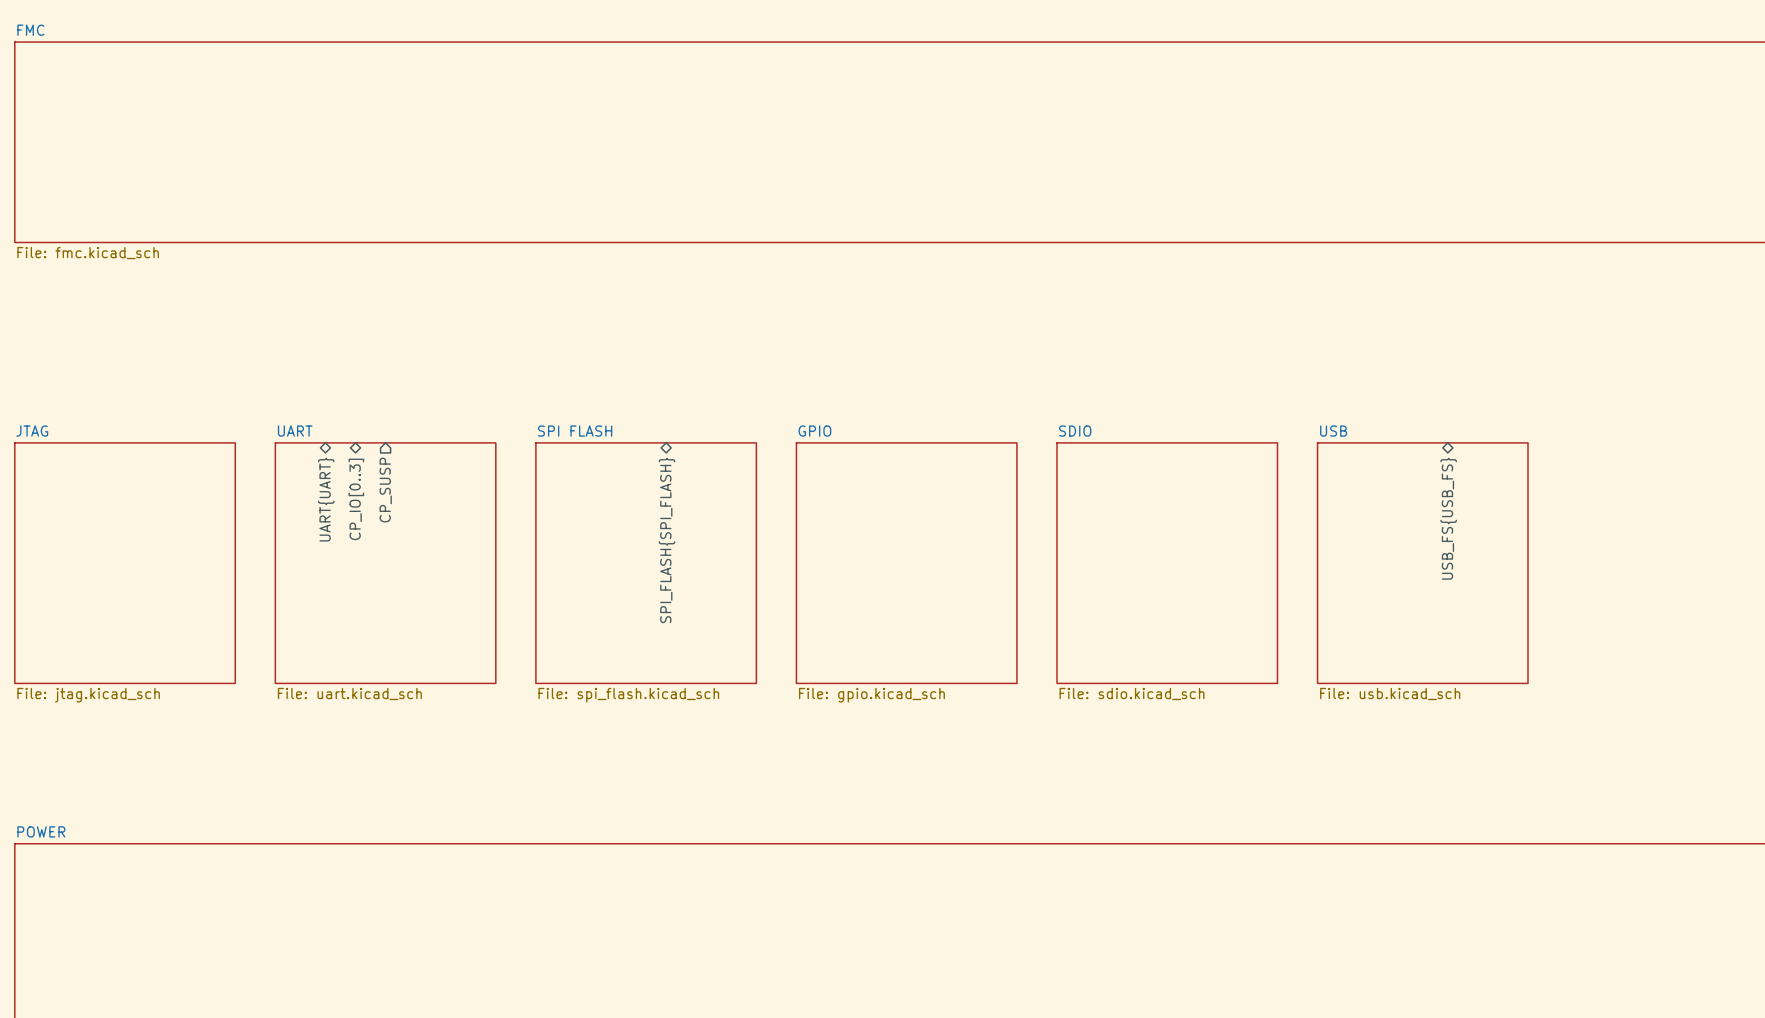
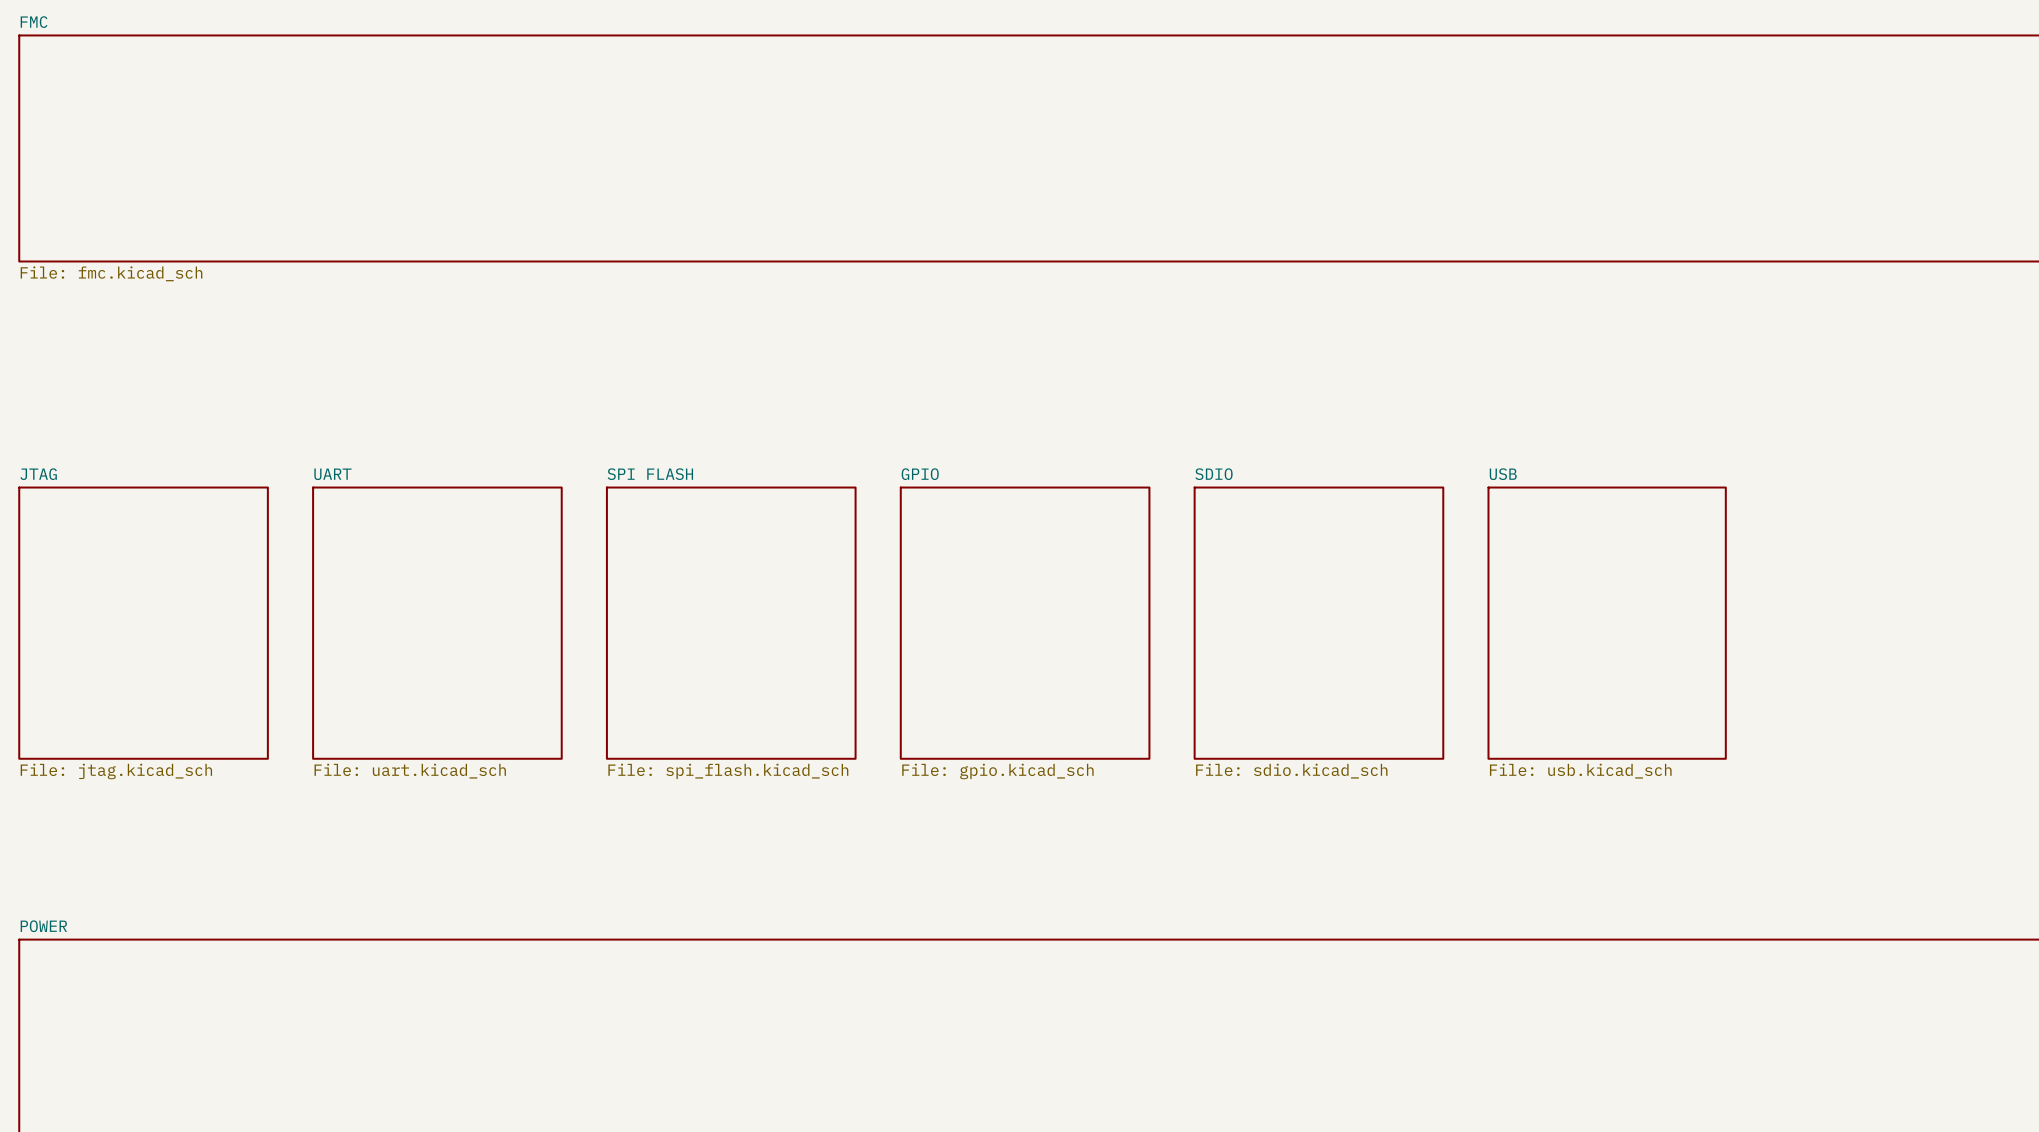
sheet pin: CP_SUSP (385, 490) -> none
sheet pin: UART{UART} (326, 499) -> none
sheet pin: CP_IO[0..3] (356, 499) -> none
sheet pin: USB_FS{USB_FS} (1448, 518) -> none
sheet pin: SPI_FLASH{SPI_FLASH} (667, 540) -> none

